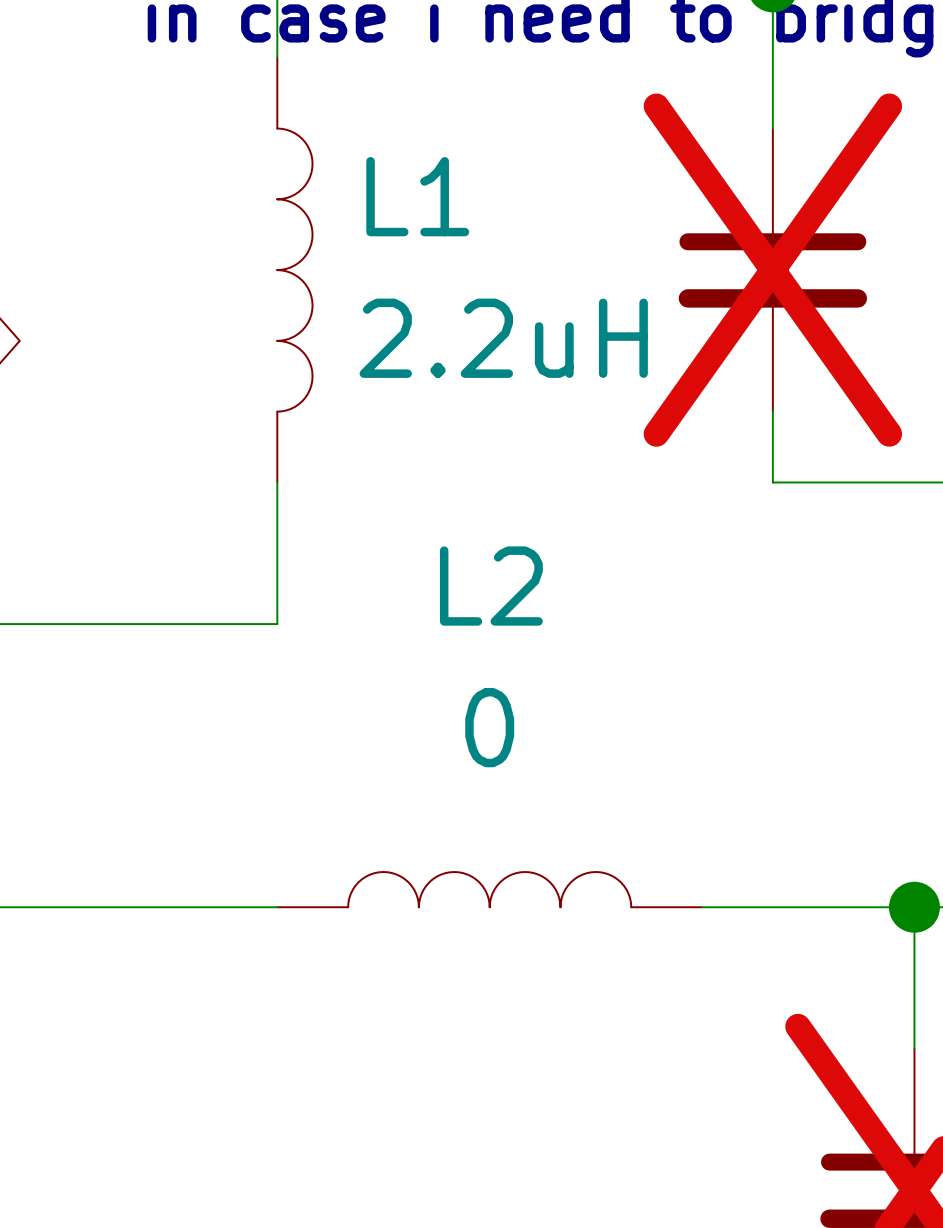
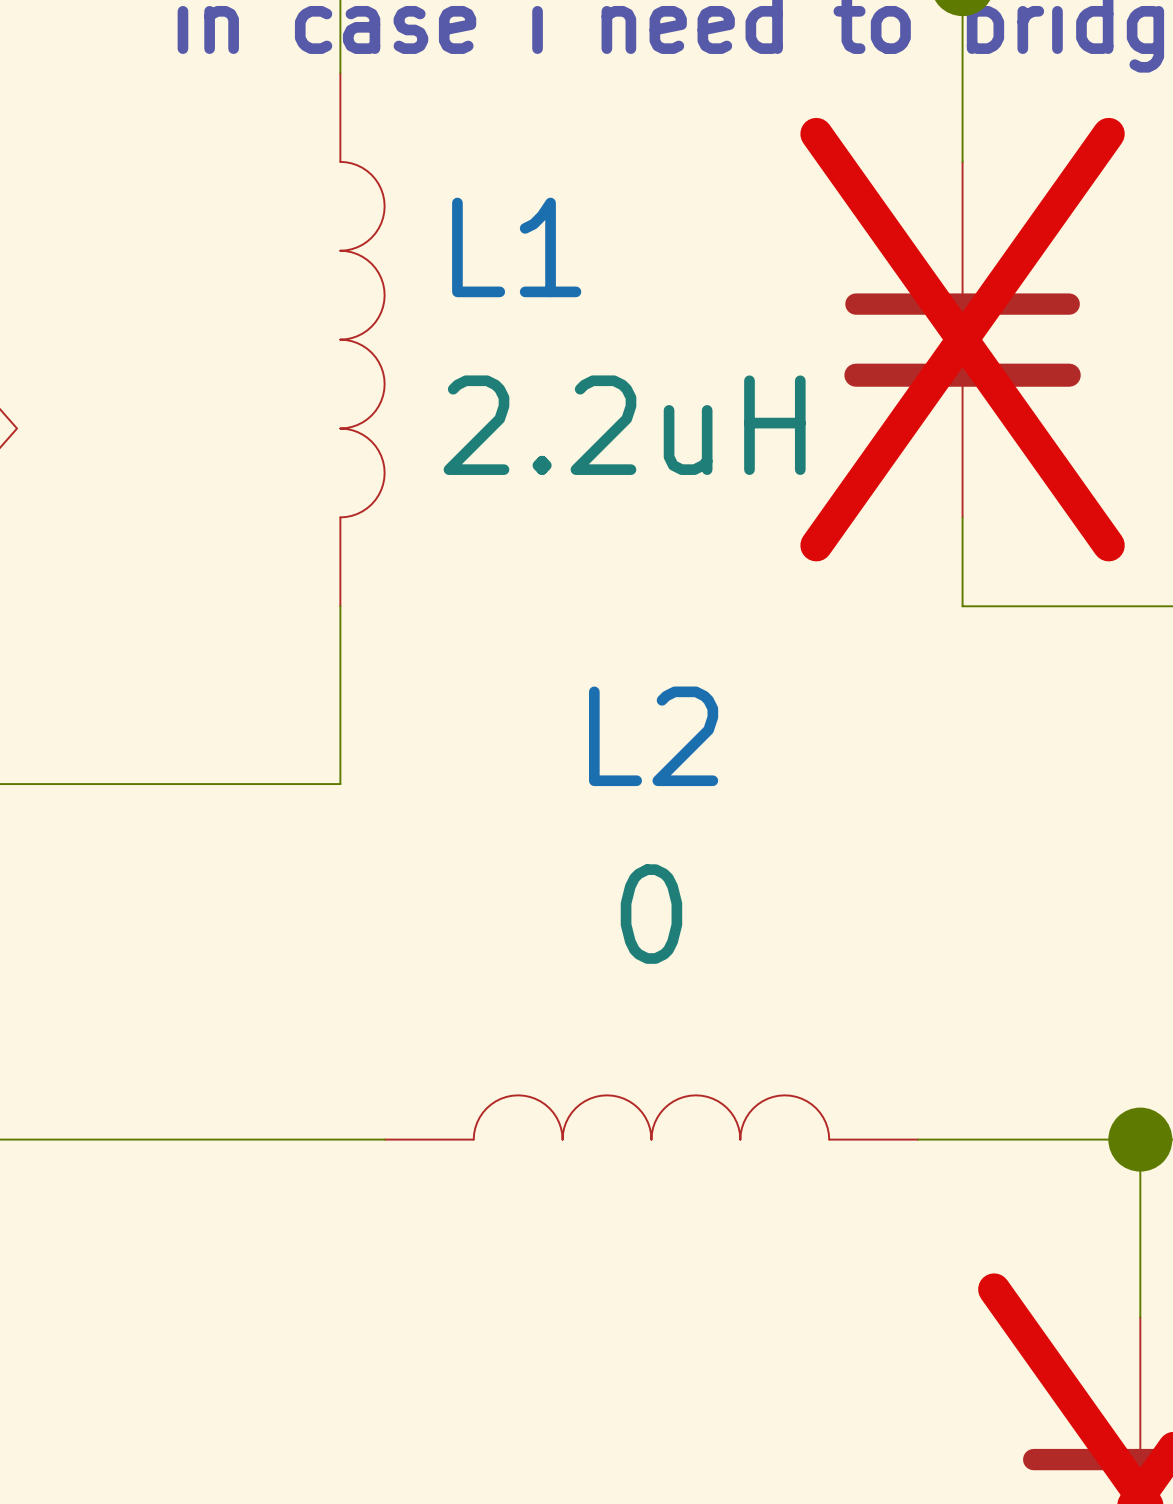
L2 position: (489, 889) -> (651, 1117)

